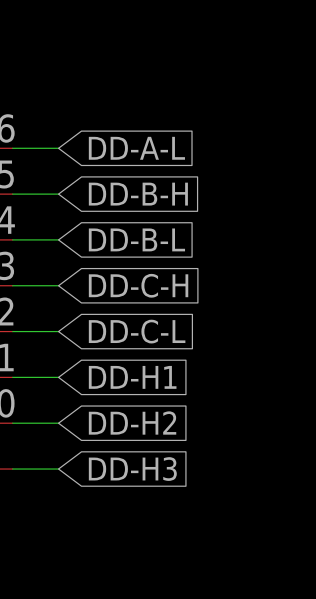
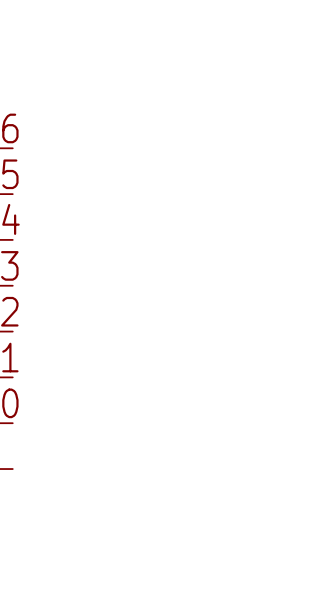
wire: (12, 148) (58, 148) -> none
global label: DD-A-L (136, 148) -> none
wire: (12, 194) (58, 194) -> none
global label: DD-B-H (138, 194) -> none
wire: (12, 239) (58, 239) -> none
global label: DD-B-L (136, 239) -> none
wire: (12, 285) (58, 285) -> none
global label: DD-C-H (138, 285) -> none
wire: (12, 331) (58, 331) -> none
global label: DD-C-L (137, 331) -> none
wire: (12, 377) (58, 377) -> none
global label: DD-H1 (132, 377) -> none
global label: DD-H2 (132, 422) -> none
wire: (12, 423) (58, 423) -> none
wire: (12, 469) (58, 469) -> none
global label: DD-H3 (132, 469) -> none

